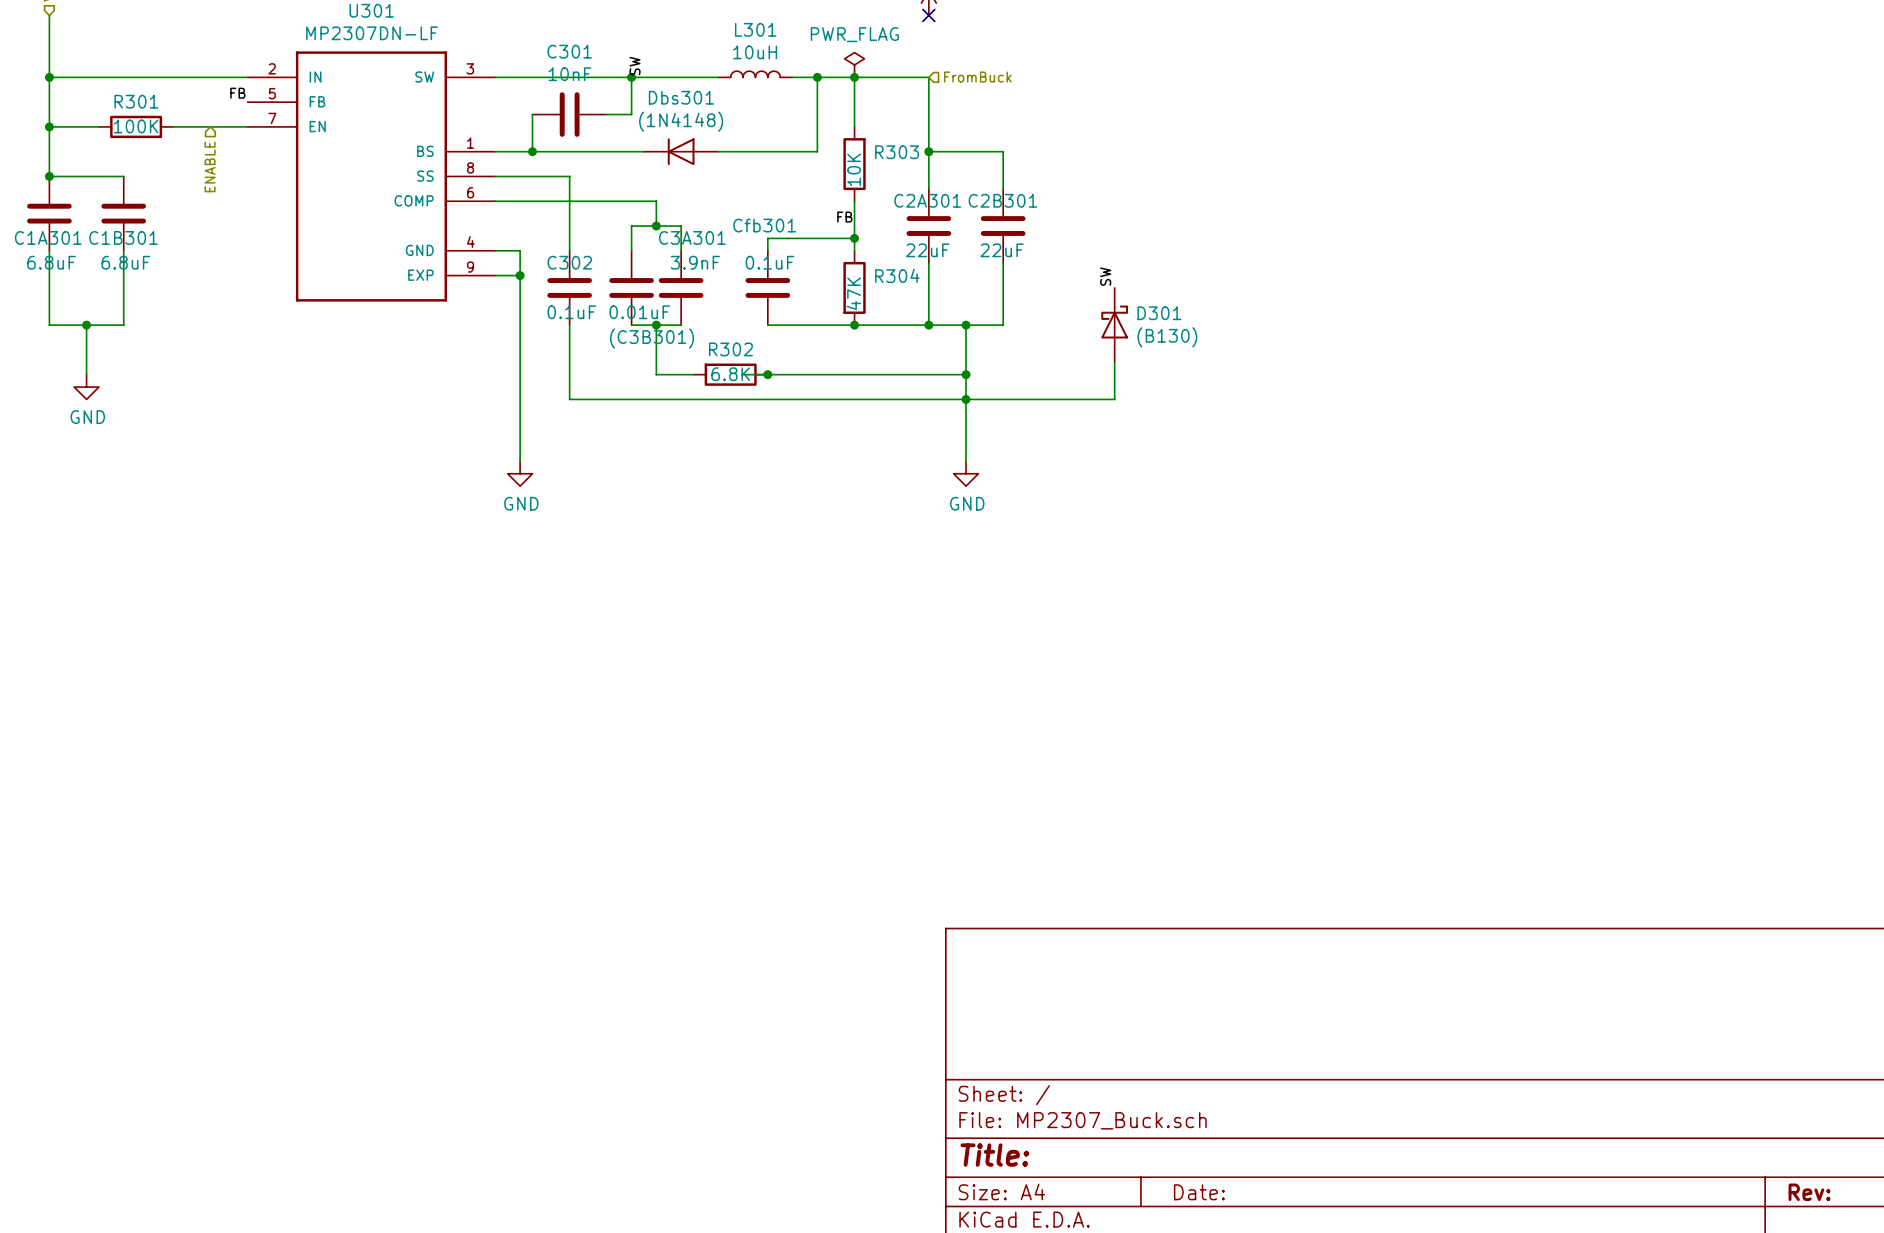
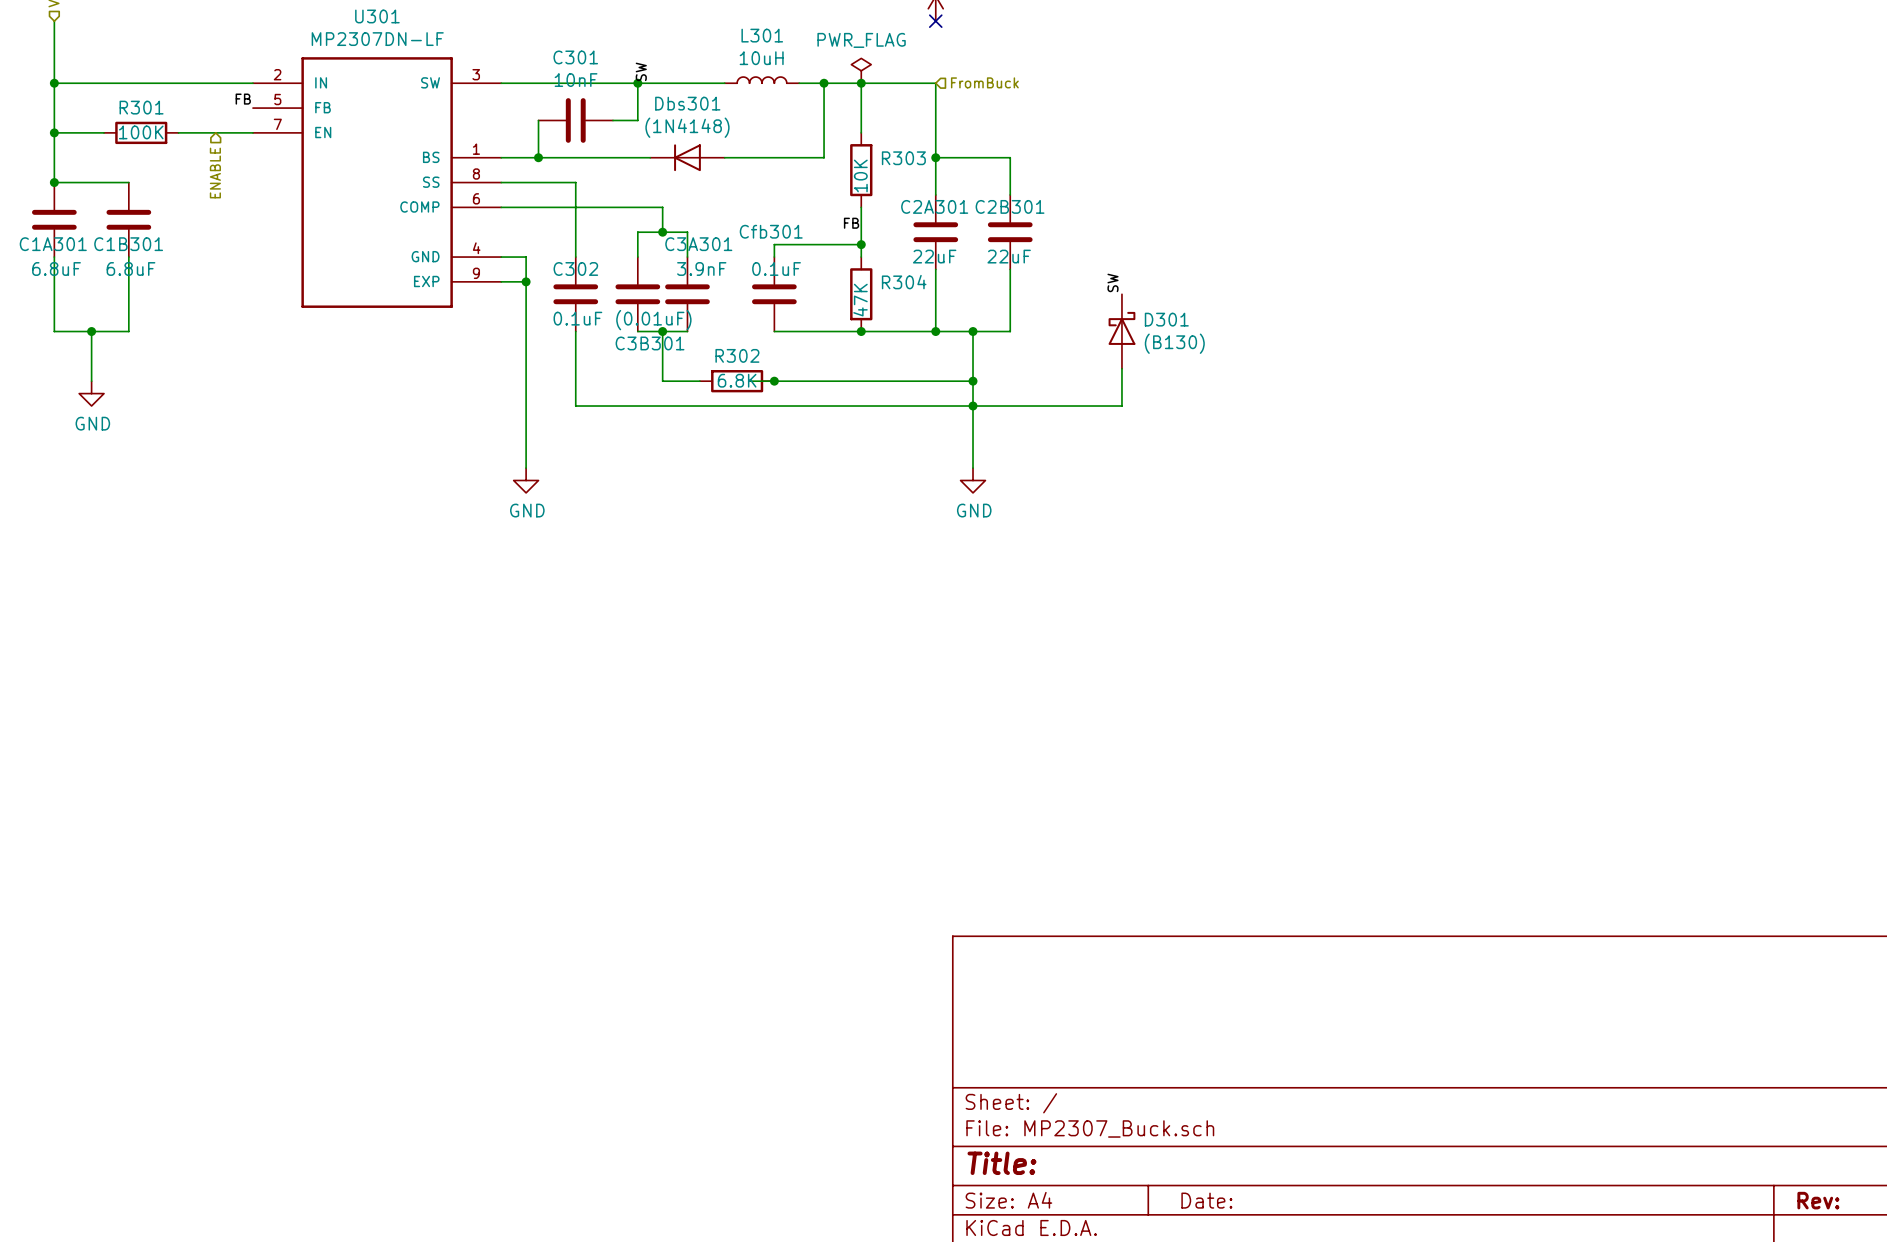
(C3B301) value: 0.01uF (639, 312) -> (0.01uF) (653, 320)
(C3B301) name: (C3B301) (652, 338) -> C3B301 (650, 343)

